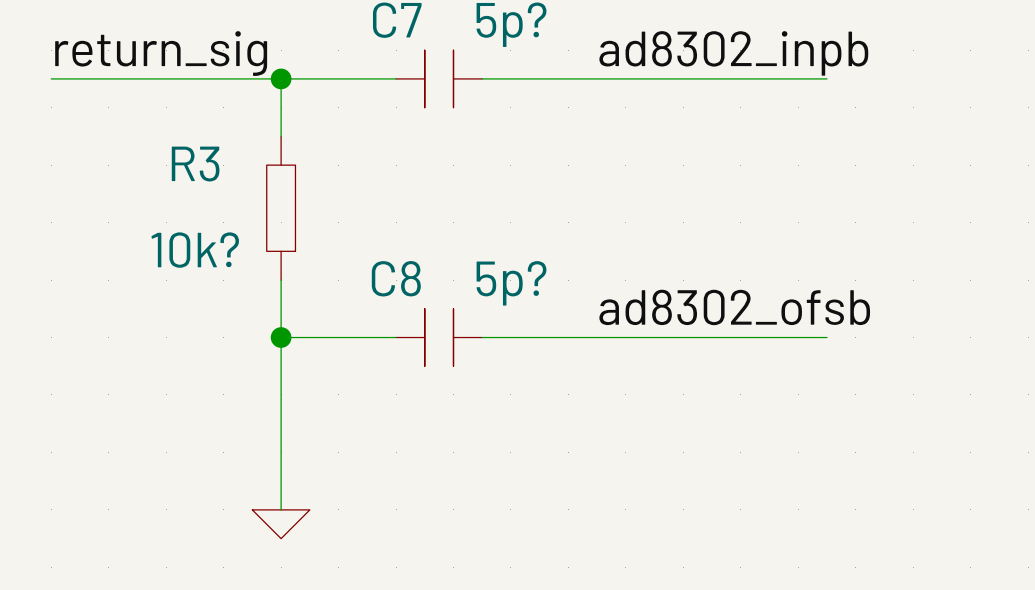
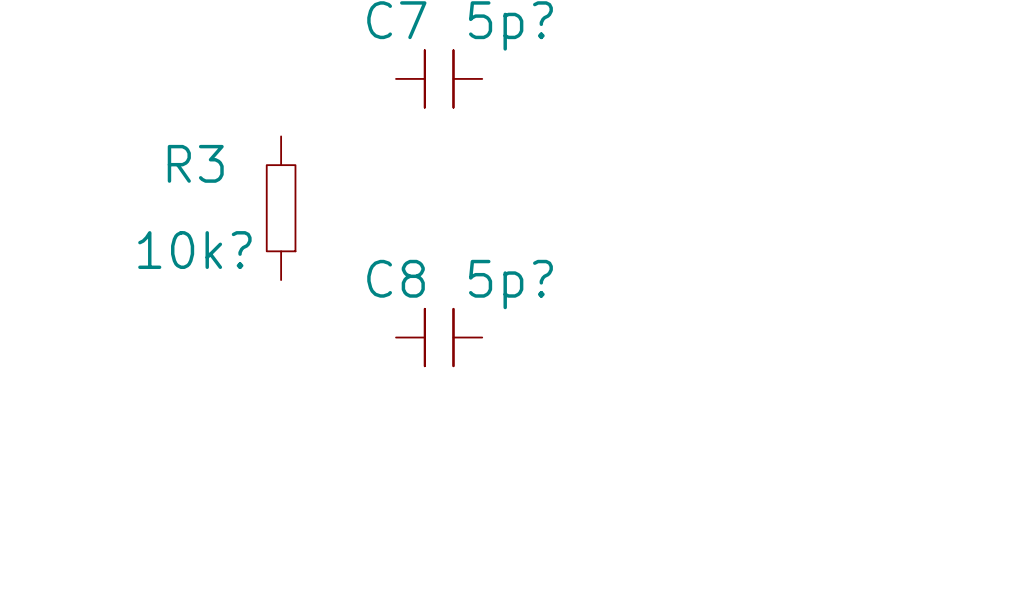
label: return_sig (161, 53) -> none
label: ad8302_inpb (733, 53) -> none
wire: (51, 78) (396, 78) -> none
wire: (281, 78) (281, 136) -> none
junction: (281, 78) -> none
wire: (482, 78) (827, 78) -> none
wire: (281, 280) (281, 509) -> none
label: ad8302_ofsb (734, 307) -> none
wire: (281, 337) (396, 337) -> none
junction: (281, 337) -> none
wire: (482, 337) (827, 337) -> none
power symbol: (281, 524) -> none

